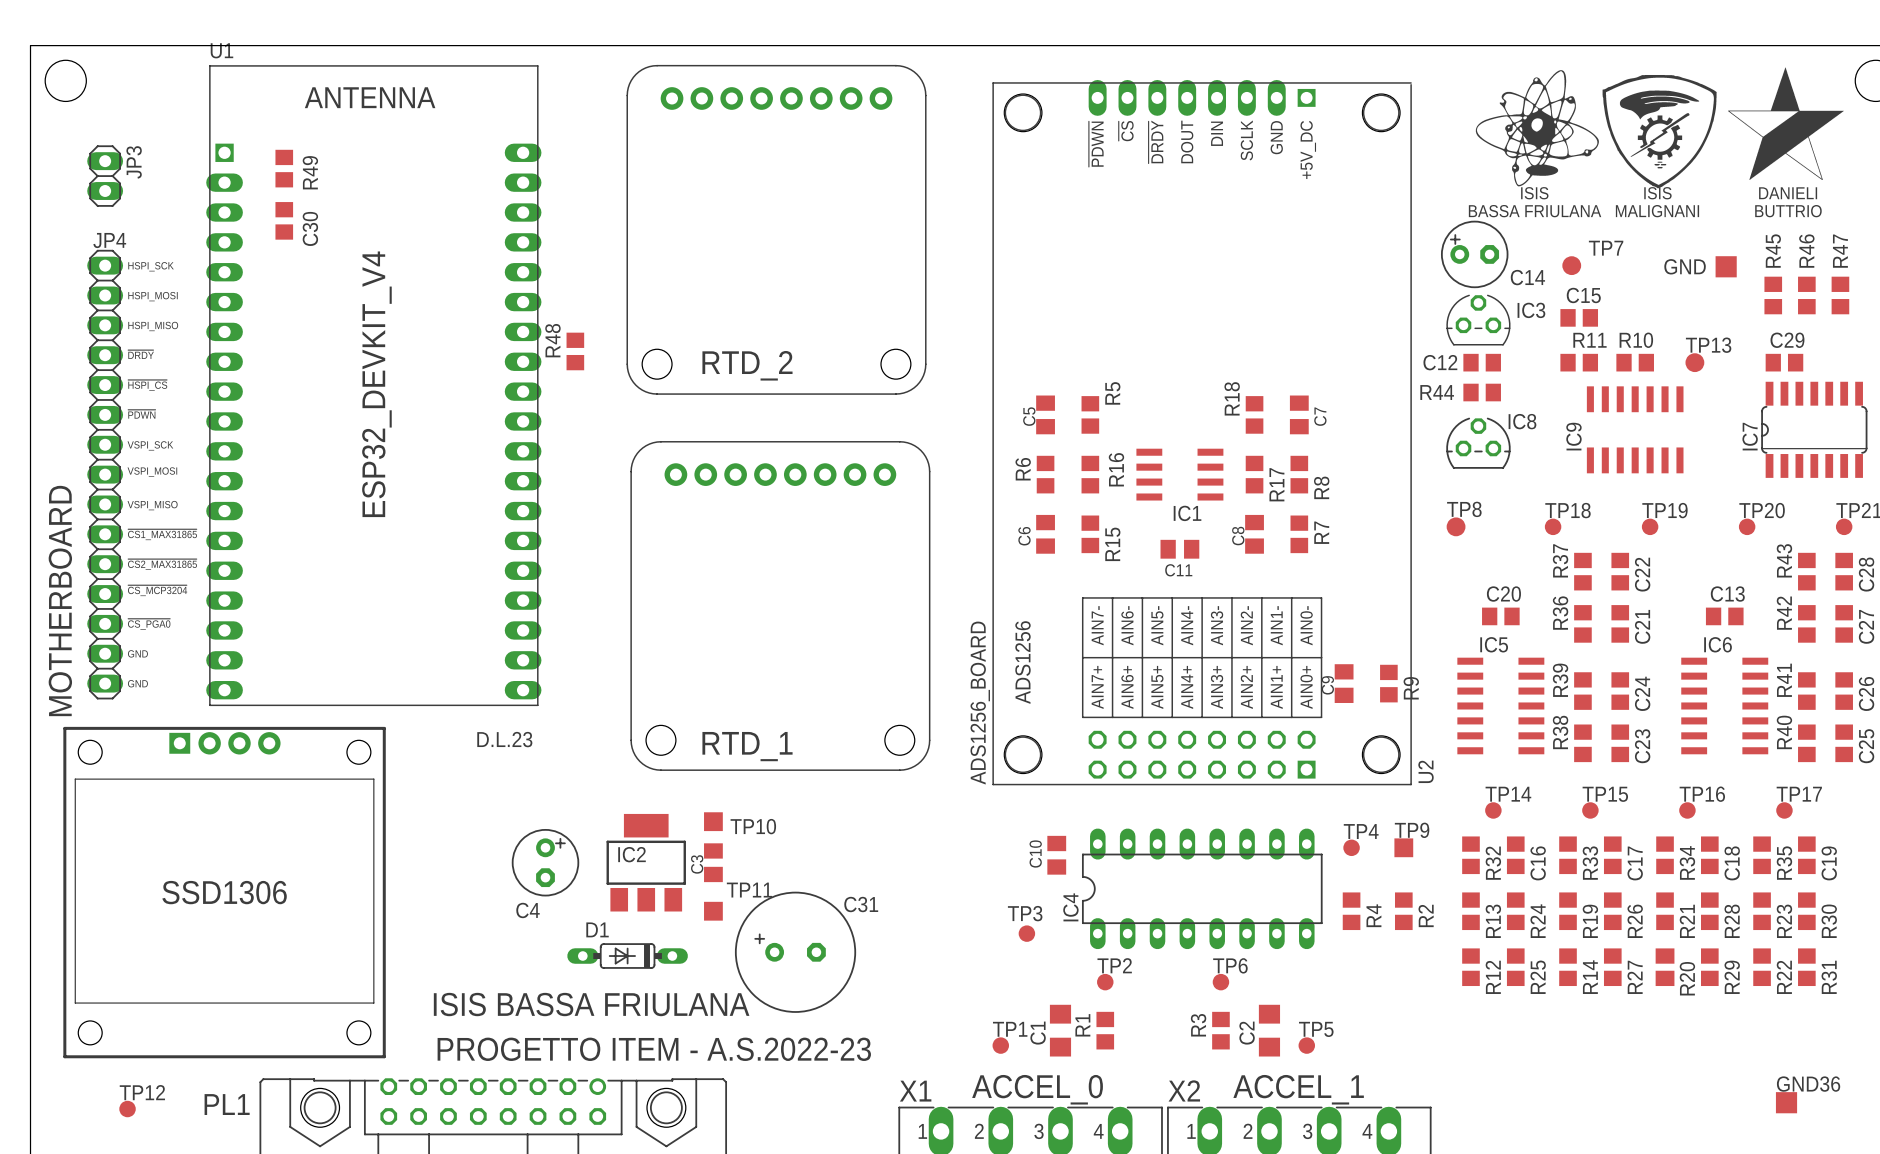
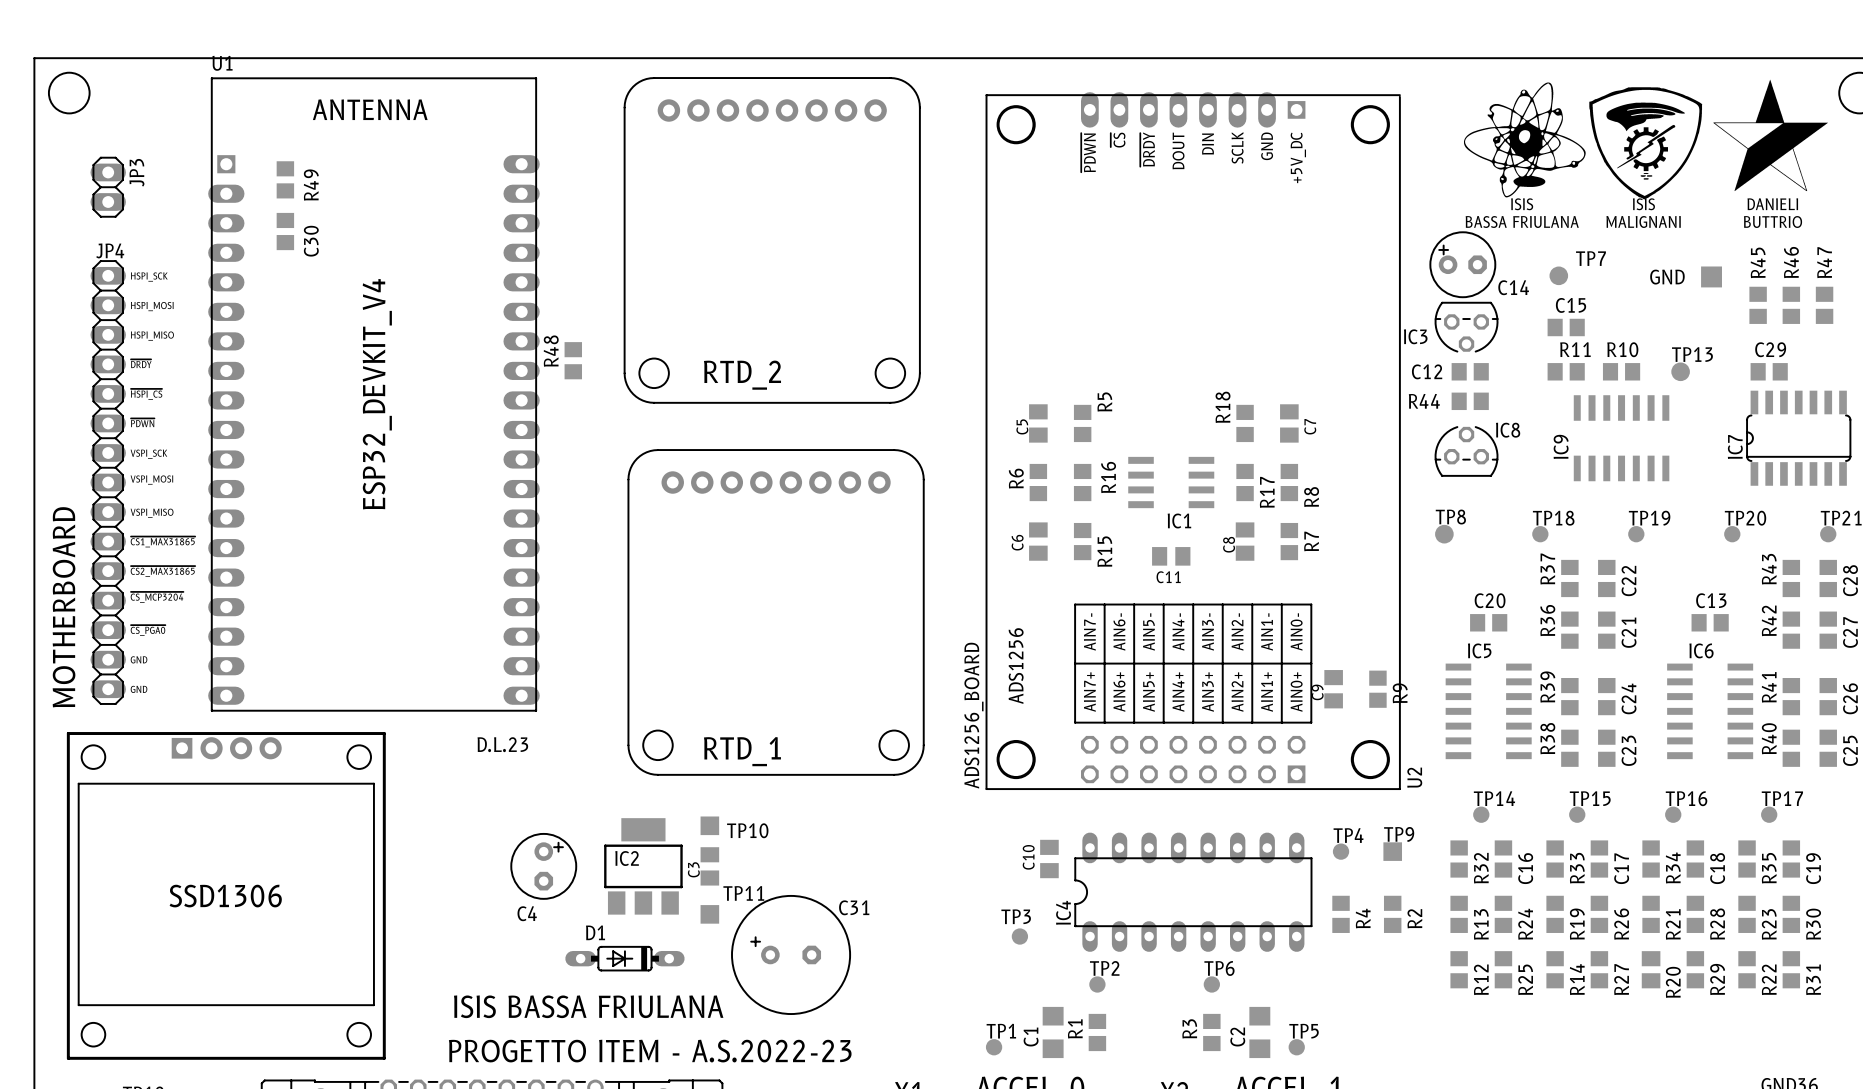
IC3 rotation: 0° (1478, 320) -> 180° (1466, 327)

